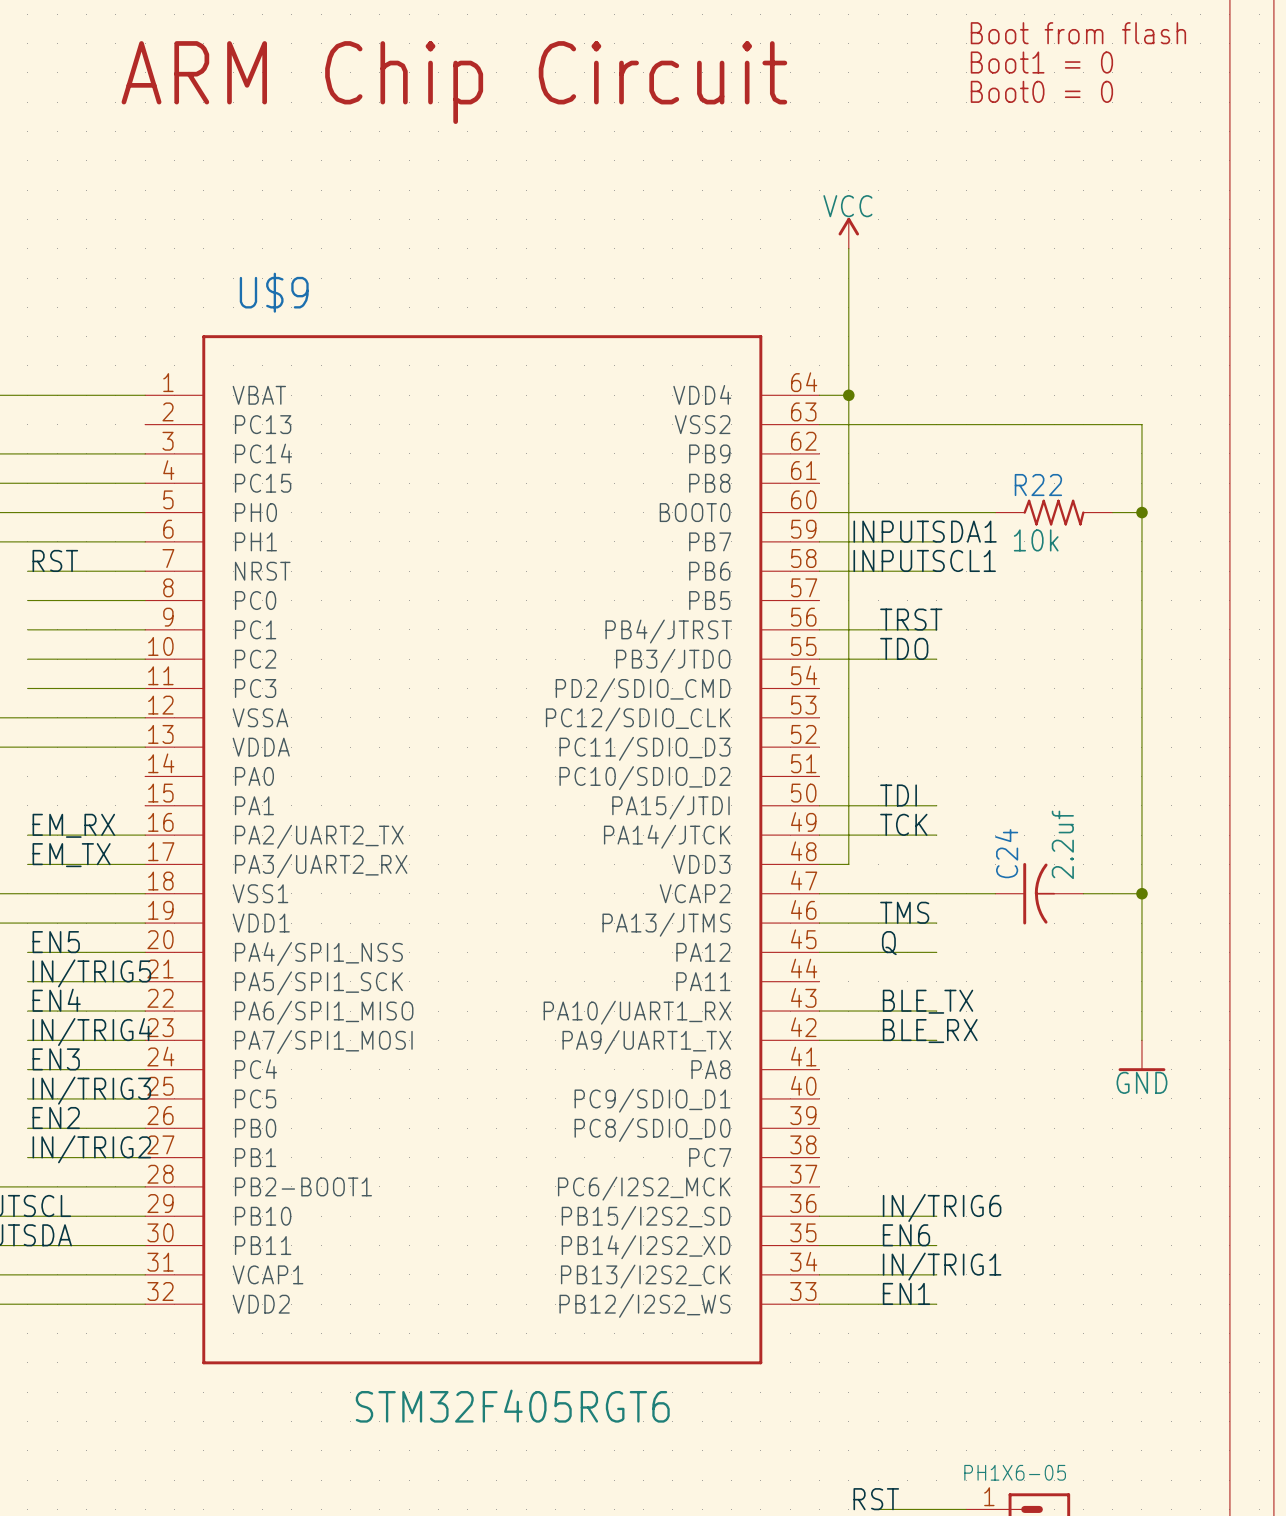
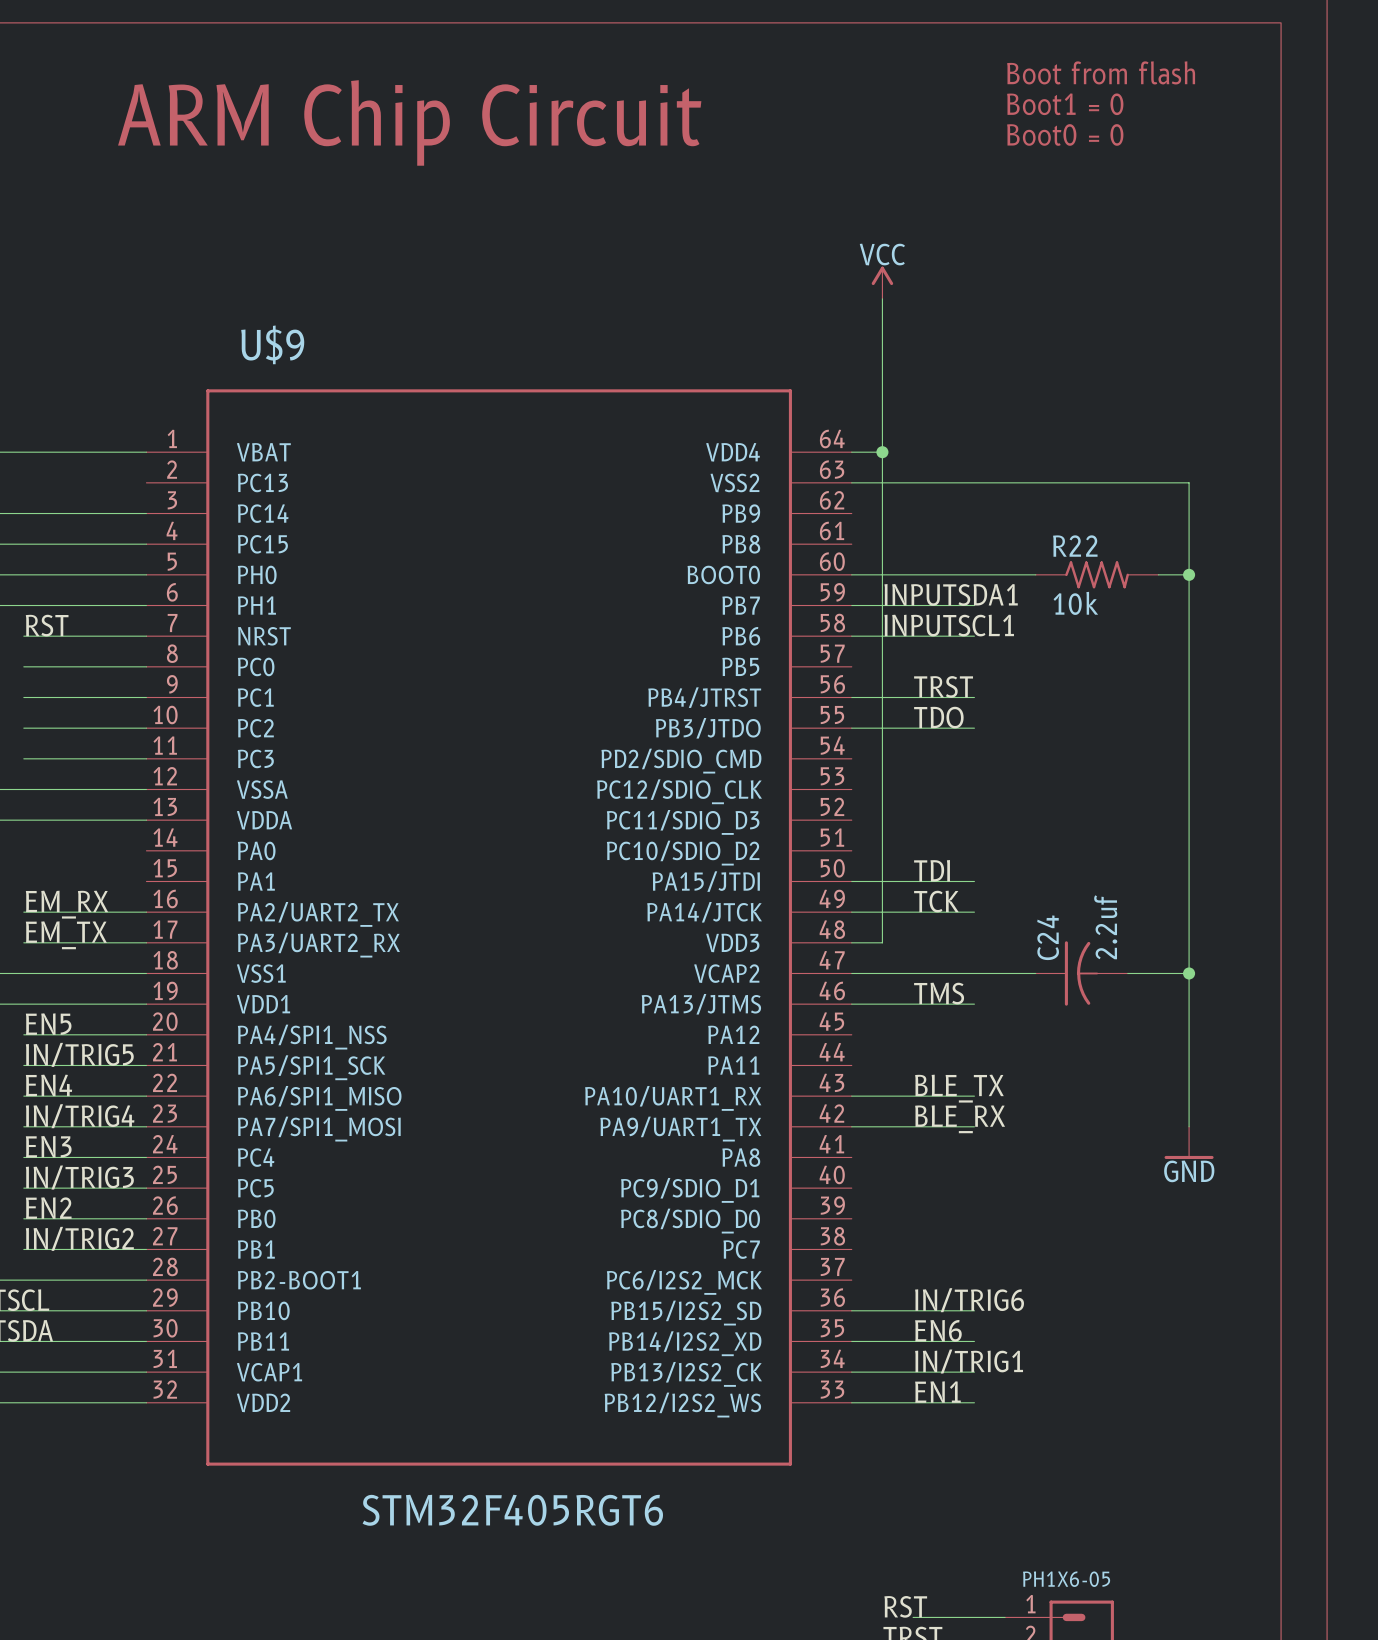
label: Q (889, 943) -> none
wire: (819, 952) (936, 952) -> none

